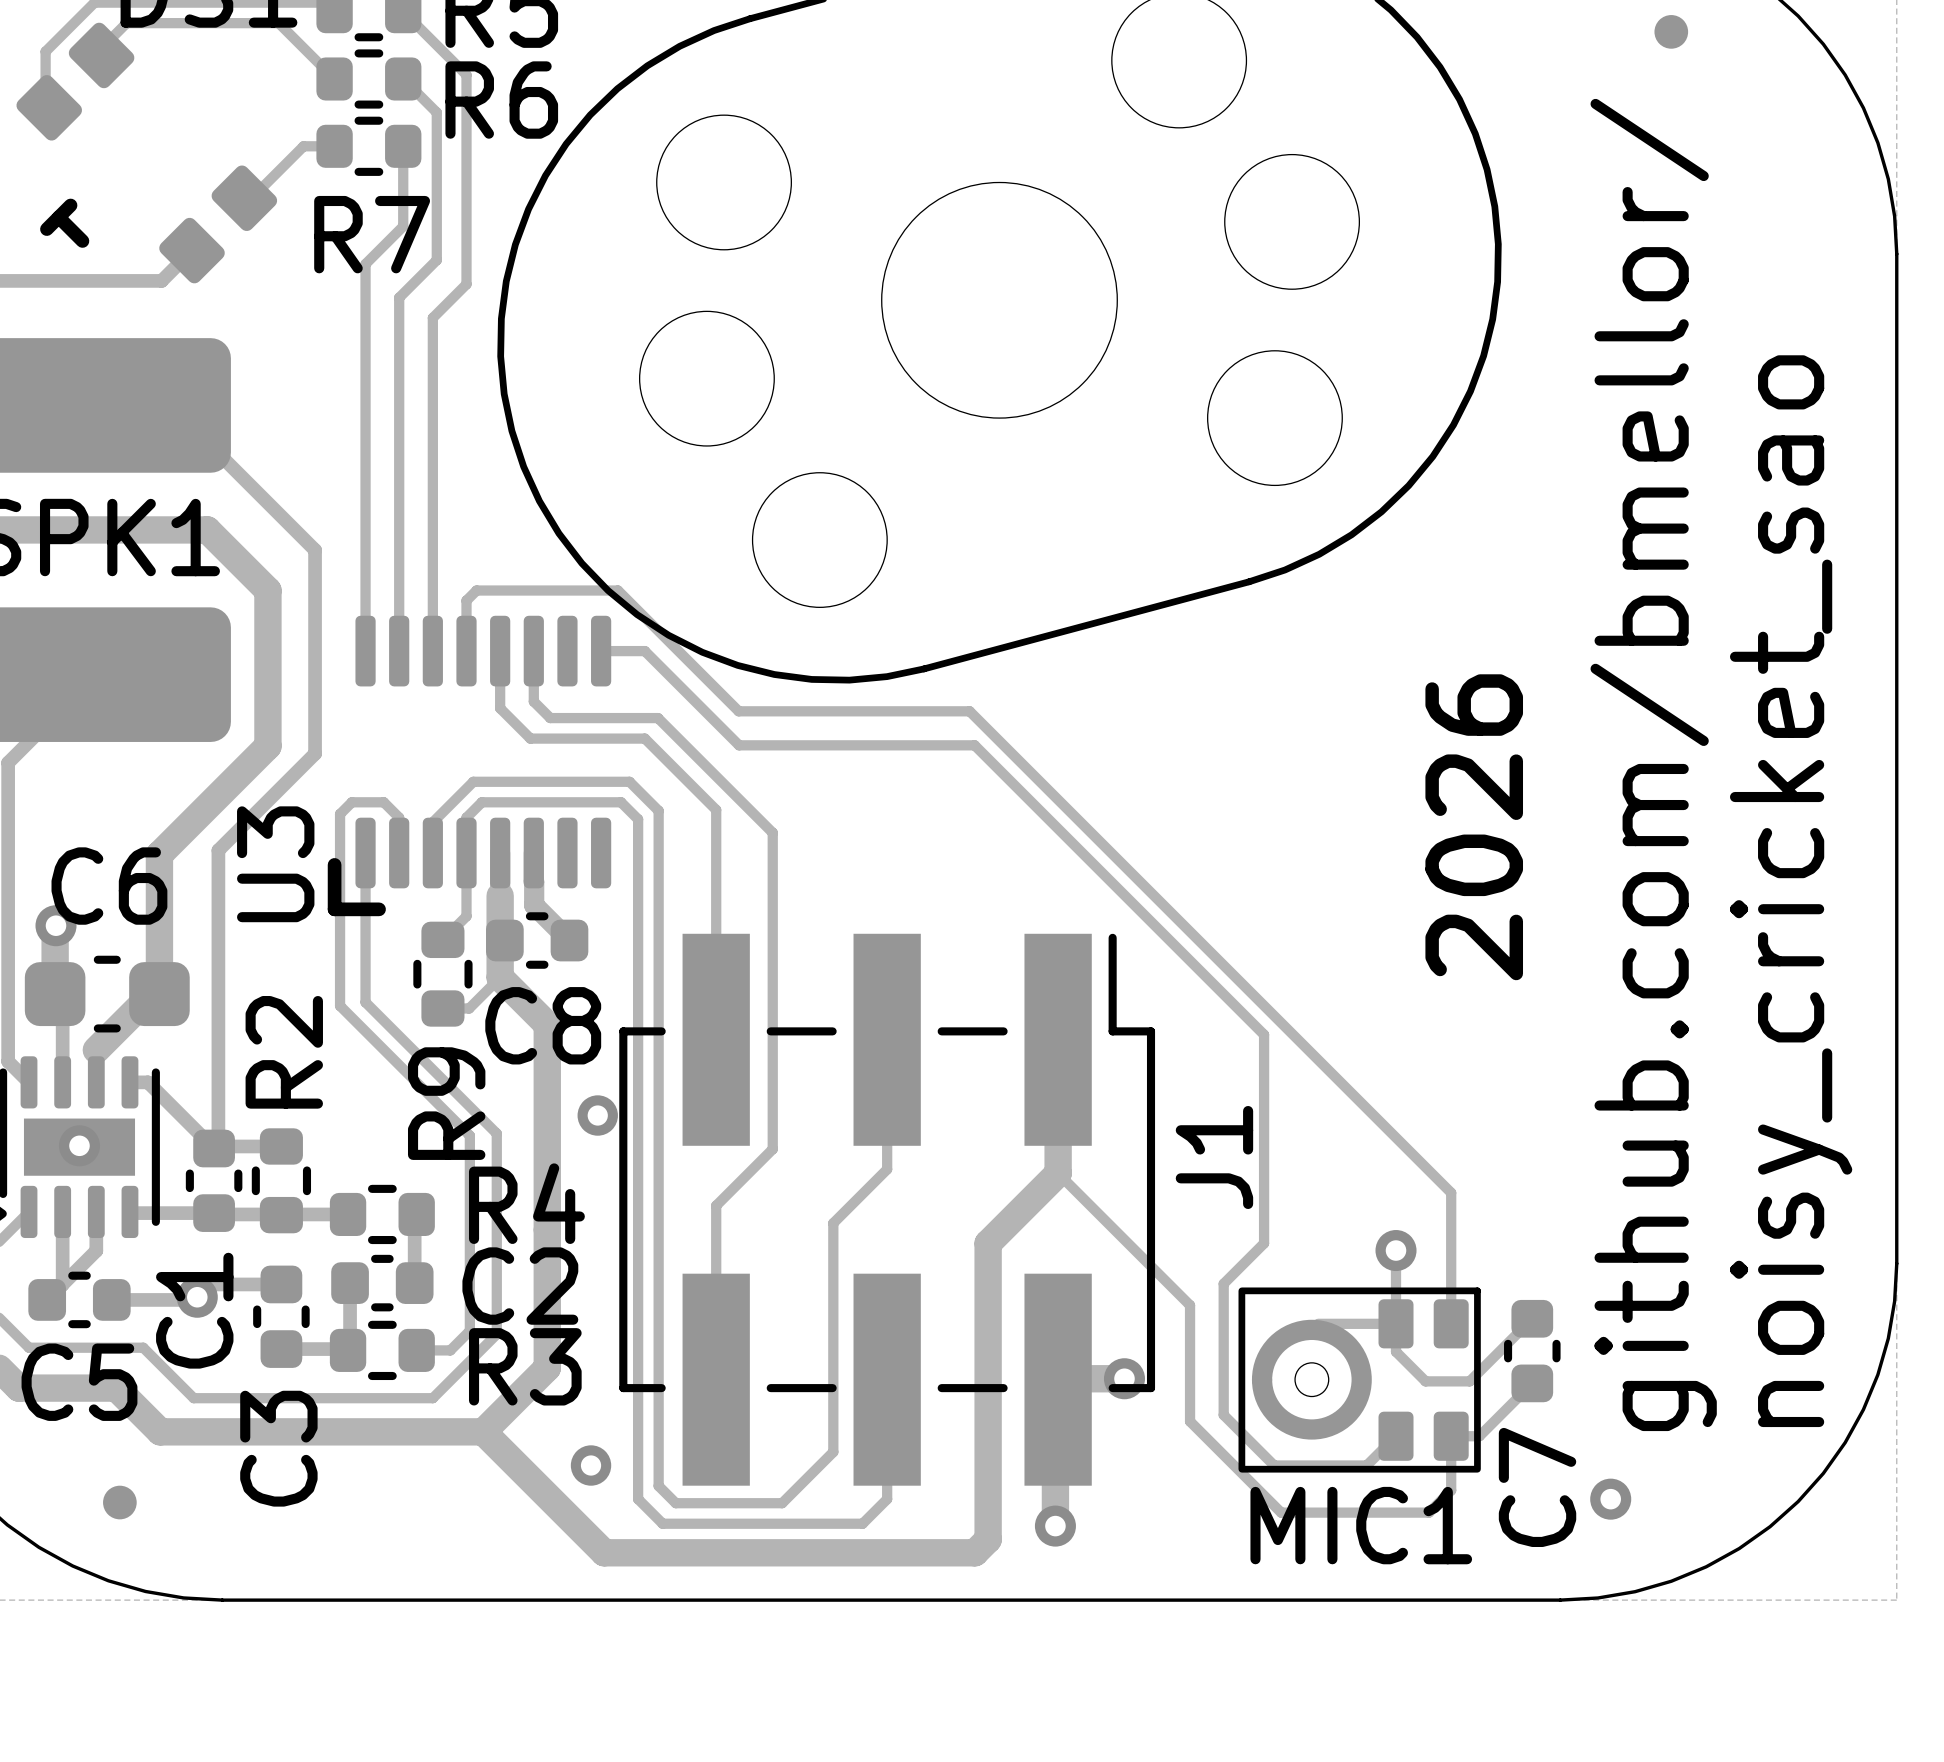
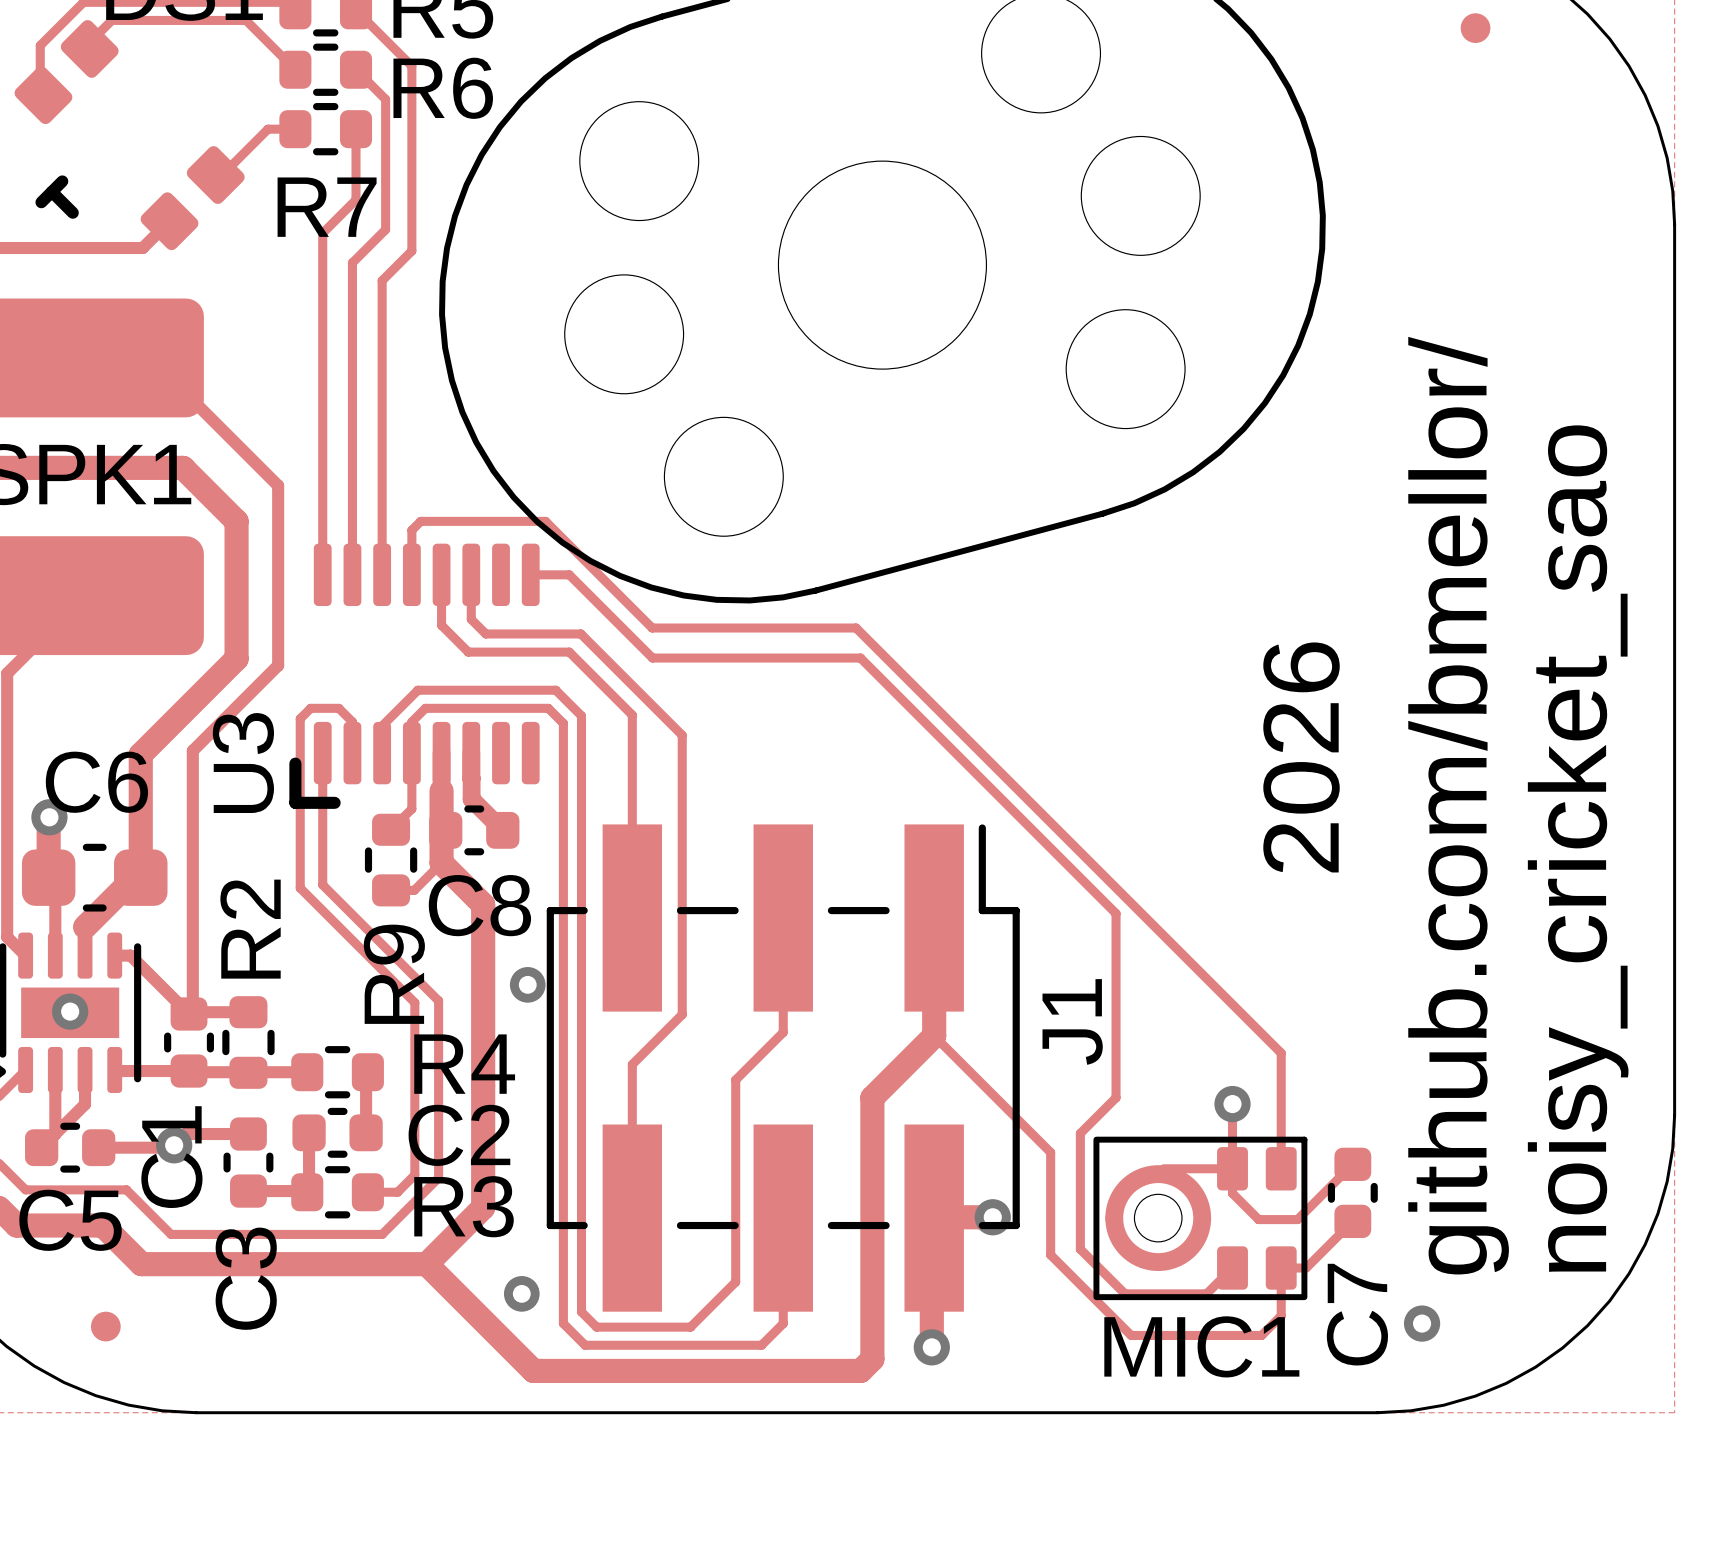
MIC1 footprint: [1238, 1287, 1481, 1473] -> [1093, 1136, 1308, 1301]

